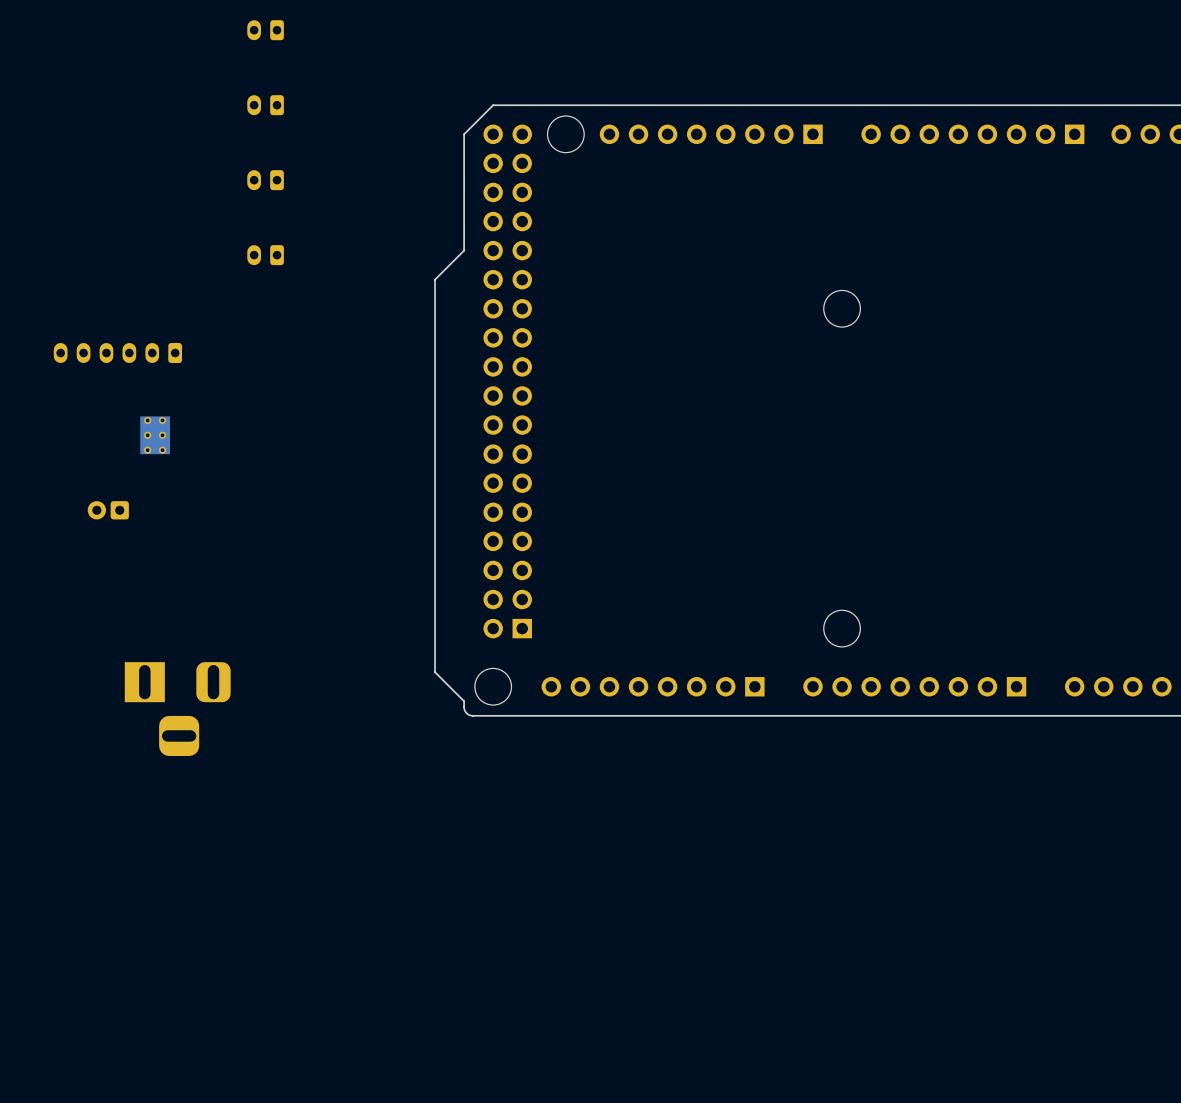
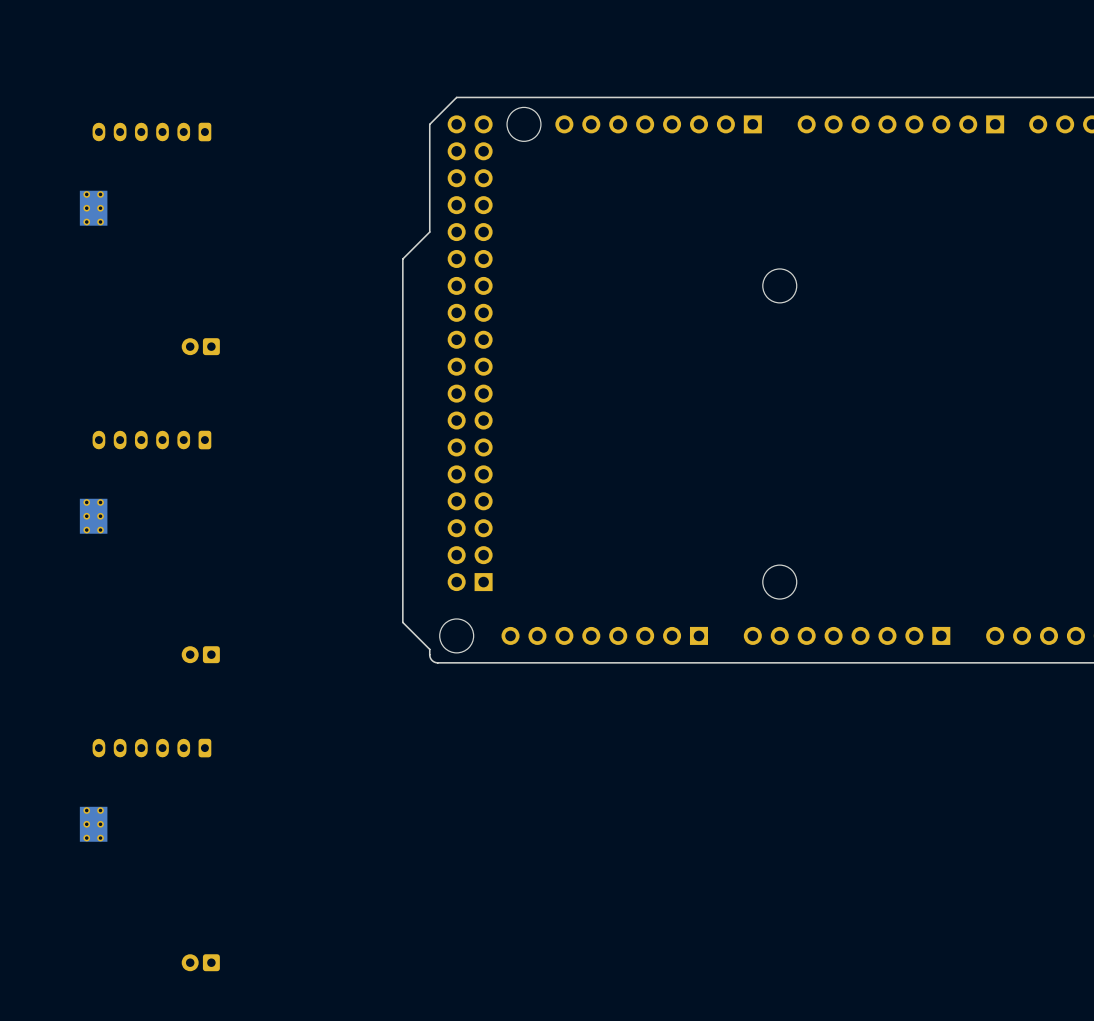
part: (265, 30) -> none
part: (265, 105) -> none
part: none -> (151, 132)
part: (265, 180) -> none
part: none -> (93, 208)
part: (265, 255) -> none
part: (117, 353) -> none
part: none -> (200, 346)
part: (155, 435) -> none
part: none -> (151, 440)
part: (108, 510) -> none
part: none -> (93, 516)
part: none -> (200, 654)
part: (177, 709) -> none
part: none -> (151, 748)
part: none -> (93, 824)
part: none -> (200, 962)

